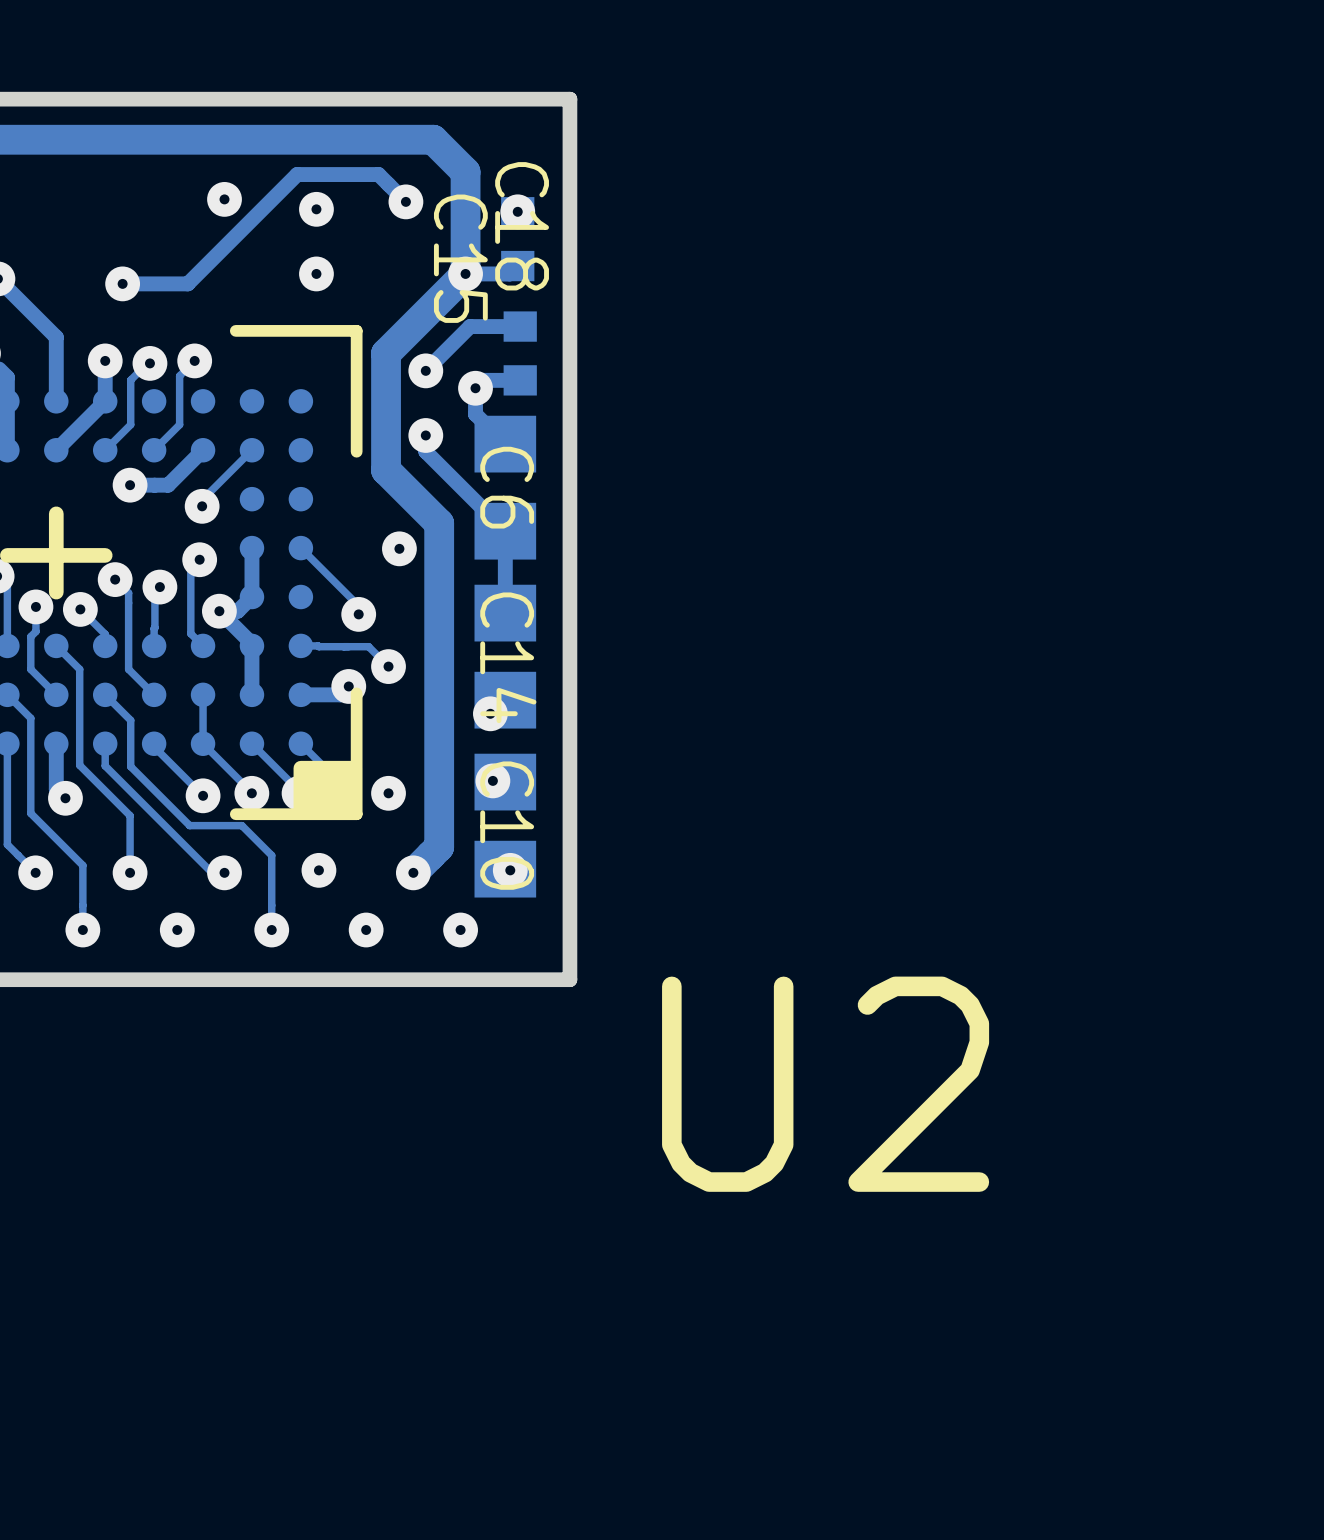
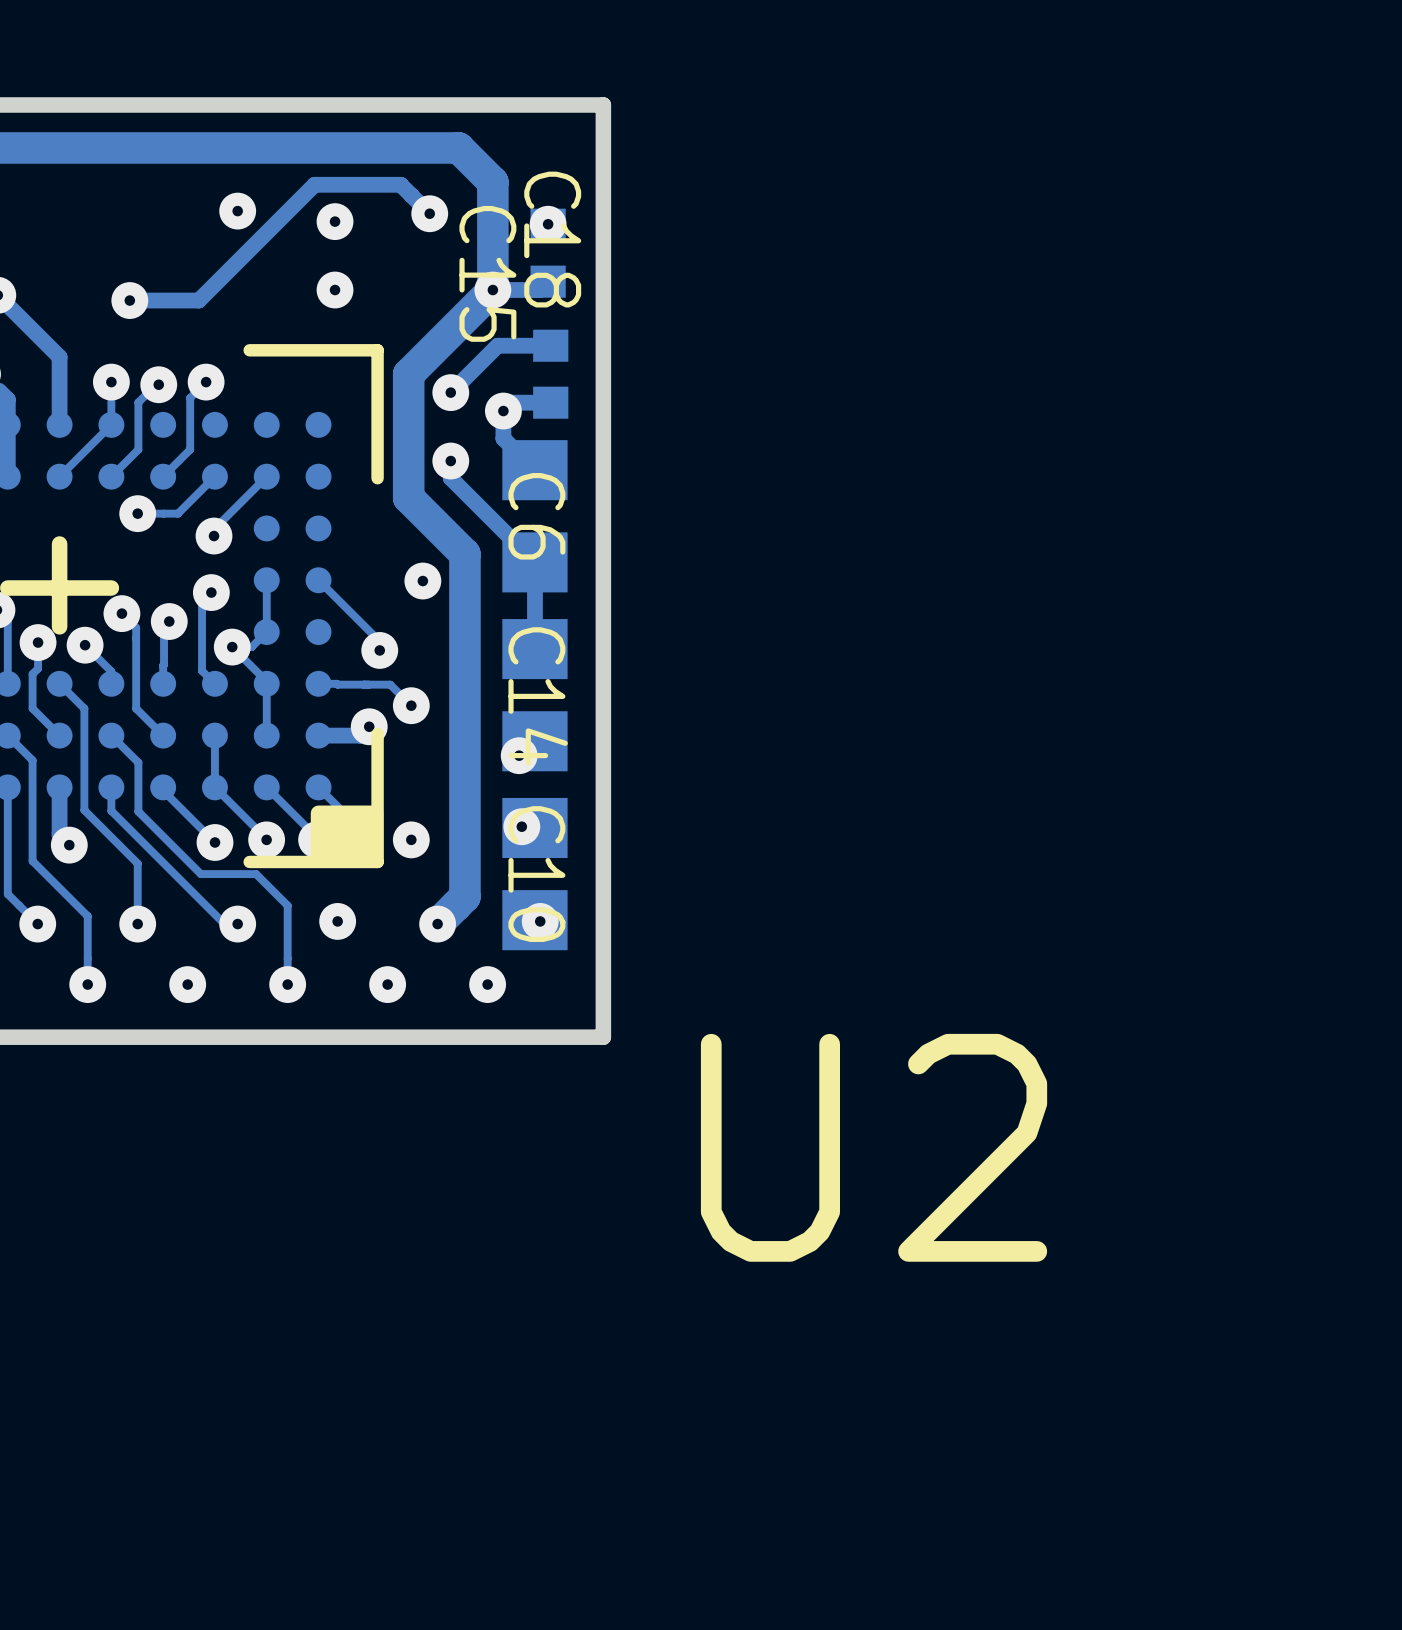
track width: thick (105, 360) (105, 401) (56, 450) -> thin (111, 382) (111, 424) (59, 476)
track width: thick (203, 450) (168, 485) (130, 485) -> thin (214, 476) (177, 513) (137, 513)
track width: thick (251, 548) (251, 597) (237, 611) (219, 611) (251, 643) (251, 694) -> thin (266, 580) (266, 632) (251, 647) (232, 647) (266, 681) (266, 735)

